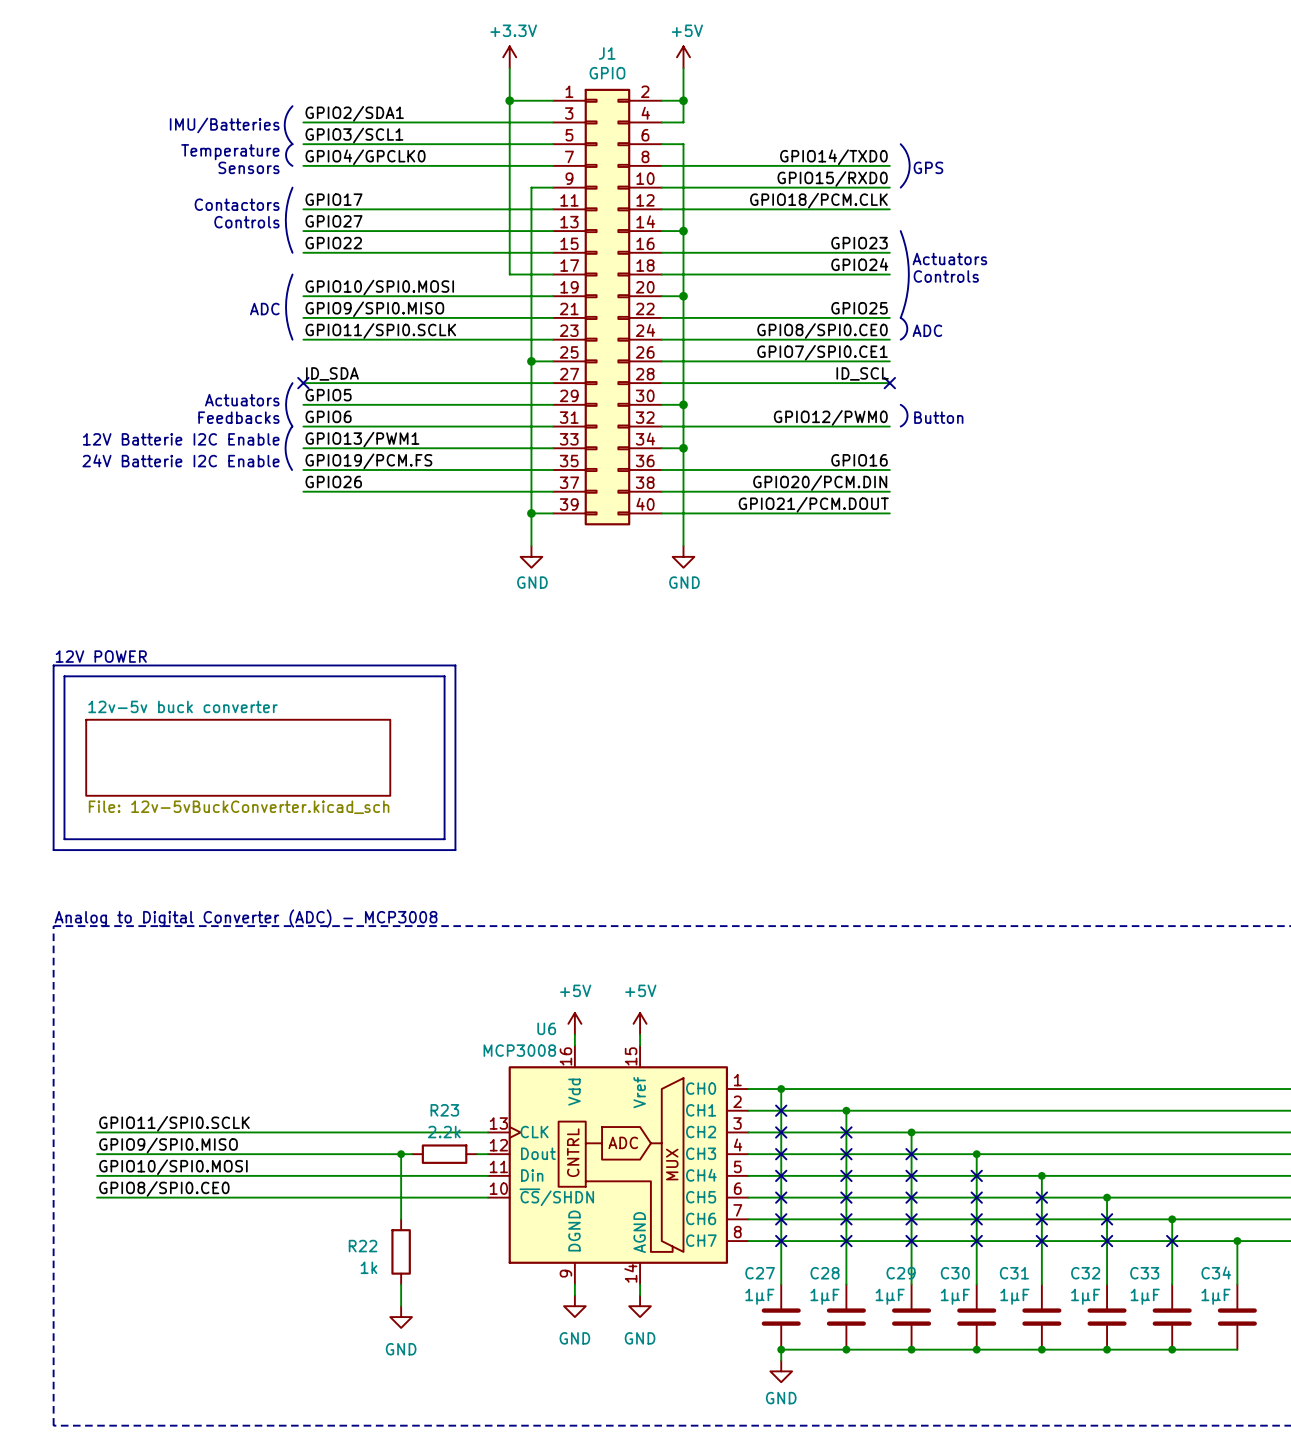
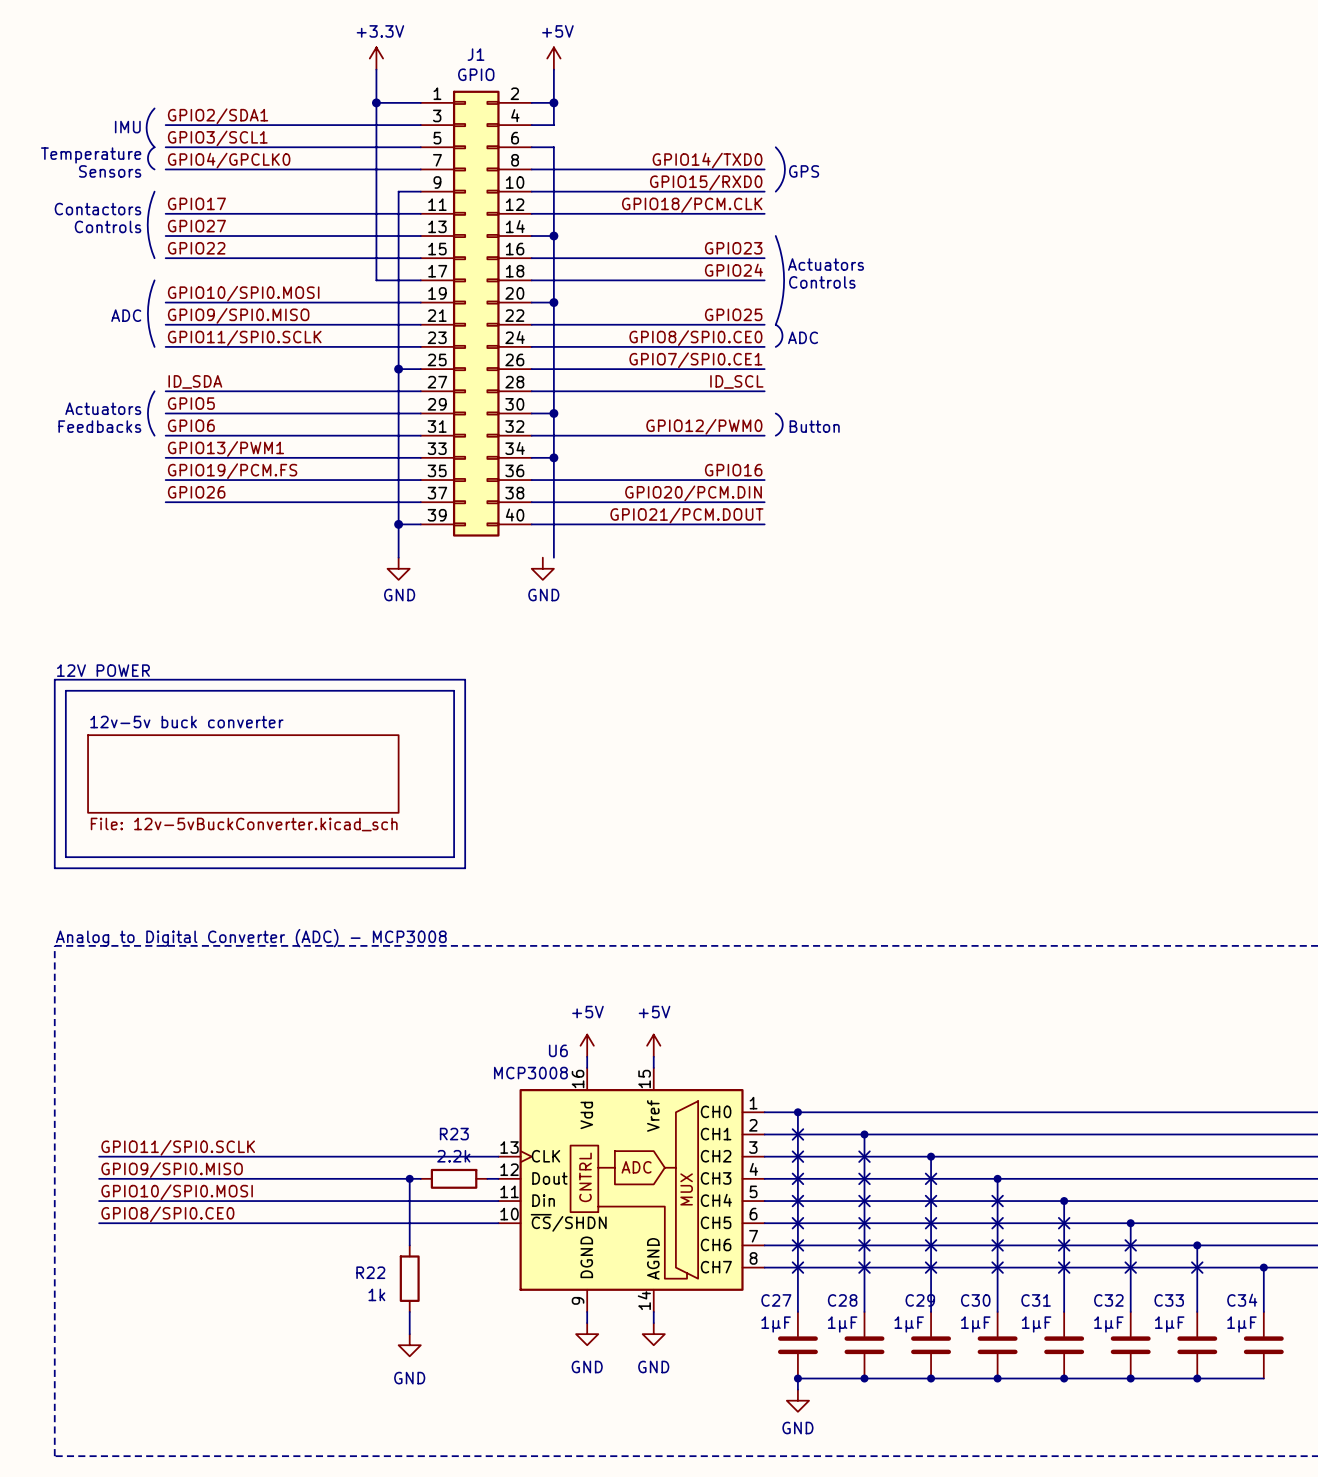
power symbol position: +3.3V (509, 57) -> +3.3V (376, 58)
power symbol position: +5V (683, 57) -> +5V (553, 58)
wire: none -> (376, 69) (376, 280) (420, 280)
wire: (509, 68) (509, 274) (520, 274) -> none
wire: (683, 68) (683, 122) (661, 122) -> none
wire: none -> (376, 102) (420, 102)
junction: none -> (376, 102)
junction position: (509, 100) -> (553, 102)
wire: (542, 100) (553, 100) -> none
wire: (661, 100) (683, 100) -> none
junction: (683, 100) -> none
line: (292, 106) (286, 114) (284, 125) (286, 135) (292, 144) (287, 149) (286, 157) (292, 165) -> (154, 108) (148, 117) (146, 127) (148, 138) (154, 147) (148, 153) (148, 161) (154, 169)
label position: GPIO2/SDA1 (354, 113) -> GPIO2/SDA1 (218, 116)
wire: none -> (165, 125) (309, 125)
wire: (542, 122) (553, 122) -> (553, 125) (553, 69)
text: none -> IMU (127, 127)
text: IMU/Batteries (224, 125) -> none
label position: GPIO3/SCL1 (354, 135) -> GPIO3/SCL1 (217, 138)
wire: none -> (165, 147) (309, 147)
wire: (542, 144) (553, 144) -> (553, 147) (553, 557)
wire: (661, 144) (683, 144) (683, 546) -> none
line: (900, 144) (907, 154) (909, 165) (907, 177) (900, 187) -> (775, 147) (782, 157) (784, 169) (782, 181) (775, 191)
text position: Temperature (230, 152) -> Temperature (91, 155)
label position: GPIO4/GPCLK0 (365, 157) -> GPIO4/GPCLK0 (229, 160)
label position: GPIO14/TXD0 (833, 157) -> GPIO14/TXD0 (707, 160)
wire: none -> (165, 169) (309, 169)
wire: (748, 165) (889, 165) -> none
text position: Sensors (249, 167) -> Sensors (110, 171)
text position: GPS (928, 167) -> GPS (804, 171)
label position: GPIO15/RXD0 (832, 178) -> GPIO15/RXD0 (706, 182)
line: (292, 187) (288, 200) (285, 220) (288, 240) (292, 252) -> (154, 191) (148, 211) (147, 224) (150, 245) (154, 258)
wire: none -> (420, 191) (398, 191) (398, 557)
wire: (531, 187) (531, 546) -> (542, 191) (531, 191)
wire: (748, 187) (889, 187) -> none
label position: GPIO17 (333, 199) -> GPIO17 (196, 203)
label position: GPIO18/PCM.CLK (818, 200) -> GPIO18/PCM.CLK (692, 204)
text position: Contactors (237, 204) -> Contactors (97, 209)
wire: none -> (165, 213) (309, 213)
wire: (748, 209) (889, 209) -> none
label position: GPIO27 (333, 221) -> GPIO27 (196, 226)
text position: Controls (246, 222) -> Controls (108, 226)
wire: none -> (165, 236) (309, 236)
wire: (542, 231) (553, 231) -> none
junction: none -> (553, 236)
wire: (661, 231) (683, 231) -> none
junction: (683, 231) -> none
line: (900, 231) (906, 252) (908, 274) (906, 296) (900, 317) (905, 323) (907, 330) (900, 339) -> (775, 236) (781, 257) (784, 280) (781, 302) (775, 324) (781, 330) (782, 337) (775, 346)
label position: GPIO22 (333, 243) -> GPIO22 (196, 248)
label position: GPIO23 (859, 243) -> GPIO23 (733, 248)
wire: none -> (165, 258) (309, 258)
wire: (748, 252) (889, 252) -> none
text position: Actuators (949, 258) -> Actuators (826, 264)
label position: GPIO24 (859, 264) -> GPIO24 (733, 270)
line: (292, 274) (288, 287) (286, 307) (288, 326) (292, 339) -> (154, 280) (148, 300) (147, 313) (150, 333) (154, 346)
wire: (748, 274) (889, 274) -> none
text position: Controls (946, 276) -> Controls (822, 282)
label position: GPIO10/SPI0.MOSI (379, 287) -> GPIO10/SPI0.MOSI (243, 293)
wire: none -> (165, 302) (309, 302)
wire: (542, 296) (553, 296) -> (531, 369) (542, 369)
junction: none -> (553, 302)
wire: (661, 296) (683, 296) -> none
junction: (683, 296) -> none
J1 position: (607, 307) -> (476, 313)
label position: GPIO25 (859, 308) -> GPIO25 (733, 314)
text position: ADC (264, 309) -> ADC (126, 315)
label position: GPIO9/SPI0.MISO (374, 309) -> GPIO9/SPI0.MISO (238, 315)
wire: none -> (165, 324) (309, 324)
wire: (748, 317) (889, 317) -> none
text position: ADC (927, 330) -> ADC (803, 337)
label position: GPIO11/SPI0.SCLK (380, 331) -> GPIO11/SPI0.SCLK (244, 338)
label position: GPIO8/SPI0.CE0 (822, 331) -> GPIO8/SPI0.CE0 (695, 338)
wire: none -> (165, 346) (309, 346)
wire: (748, 339) (889, 339) -> none
label position: GPIO7/SPI0.CE1 (822, 352) -> GPIO7/SPI0.CE1 (695, 360)
wire: none -> (398, 369) (420, 369)
junction: none -> (398, 369)
junction: (531, 361) -> none
wire: (748, 361) (889, 361) -> none
label position: ID_SDA (332, 373) -> ID_SDA (195, 381)
label position: ID_SCL (862, 373) -> ID_SCL (736, 381)
wire: none -> (165, 391) (309, 391)
line: (292, 383) (288, 391) (286, 404) (288, 418) (292, 426) -> (154, 391) (150, 399) (147, 413) (150, 427) (154, 435)
no-connect mark: (303, 383) -> none
wire: (748, 383) (889, 383) -> none
no-connect mark: (889, 383) -> none
label position: GPIO5 (328, 395) -> GPIO5 (191, 403)
text position: Actuators (242, 400) -> Actuators (103, 408)
wire: none -> (165, 413) (309, 413)
wire: (542, 404) (553, 404) -> none
junction: none -> (553, 413)
wire: (661, 404) (683, 404) -> none
junction: (683, 404) -> none
line: (900, 404) (906, 409) (907, 415) (905, 422) (900, 426) -> (775, 413) (781, 418) (782, 424) (780, 431) (775, 435)
label position: GPIO6 (328, 416) -> GPIO6 (191, 425)
text position: Feedbacks (238, 417) -> Feedbacks (99, 426)
label position: GPIO12/PWM0 (830, 417) -> GPIO12/PWM0 (704, 426)
text position: Button (938, 417) -> Button (814, 426)
wire: none -> (165, 435) (309, 435)
line: (292, 426) (287, 434) (285, 448) (286, 457) (292, 470) -> none
wire: (748, 426) (889, 426) -> none
text: 12V Batterie I2C Enable (181, 439) -> none
label position: GPIO13/PWM1 (362, 439) -> GPIO13/PWM1 (225, 449)
wire: none -> (165, 457) (309, 457)
wire: (542, 448) (553, 448) -> (531, 524) (542, 524)
junction: none -> (553, 457)
wire: (661, 448) (683, 448) -> none
junction: (683, 448) -> none
text: 24V Batterie I2C Enable (181, 460) -> none
label position: GPIO16 (859, 460) -> GPIO16 (733, 470)
label position: GPIO19/PCM.FS (368, 461) -> GPIO19/PCM.FS (232, 471)
wire: none -> (165, 480) (309, 480)
wire: (748, 469) (889, 469) -> none
label position: GPIO26 (333, 482) -> GPIO26 (196, 492)
label position: GPIO20/PCM.DIN (820, 483) -> GPIO20/PCM.DIN (693, 493)
wire: none -> (165, 502) (309, 502)
wire: (748, 491) (889, 491) -> none
label position: GPIO21/PCM.DOUT (813, 504) -> GPIO21/PCM.DOUT (686, 515)
wire: none -> (398, 524) (420, 524)
junction: none -> (398, 524)
junction: (531, 513) -> none
wire: (748, 513) (889, 513) -> none
power symbol: none -> GND (398, 568)
power symbol: GND (683, 556) -> none

